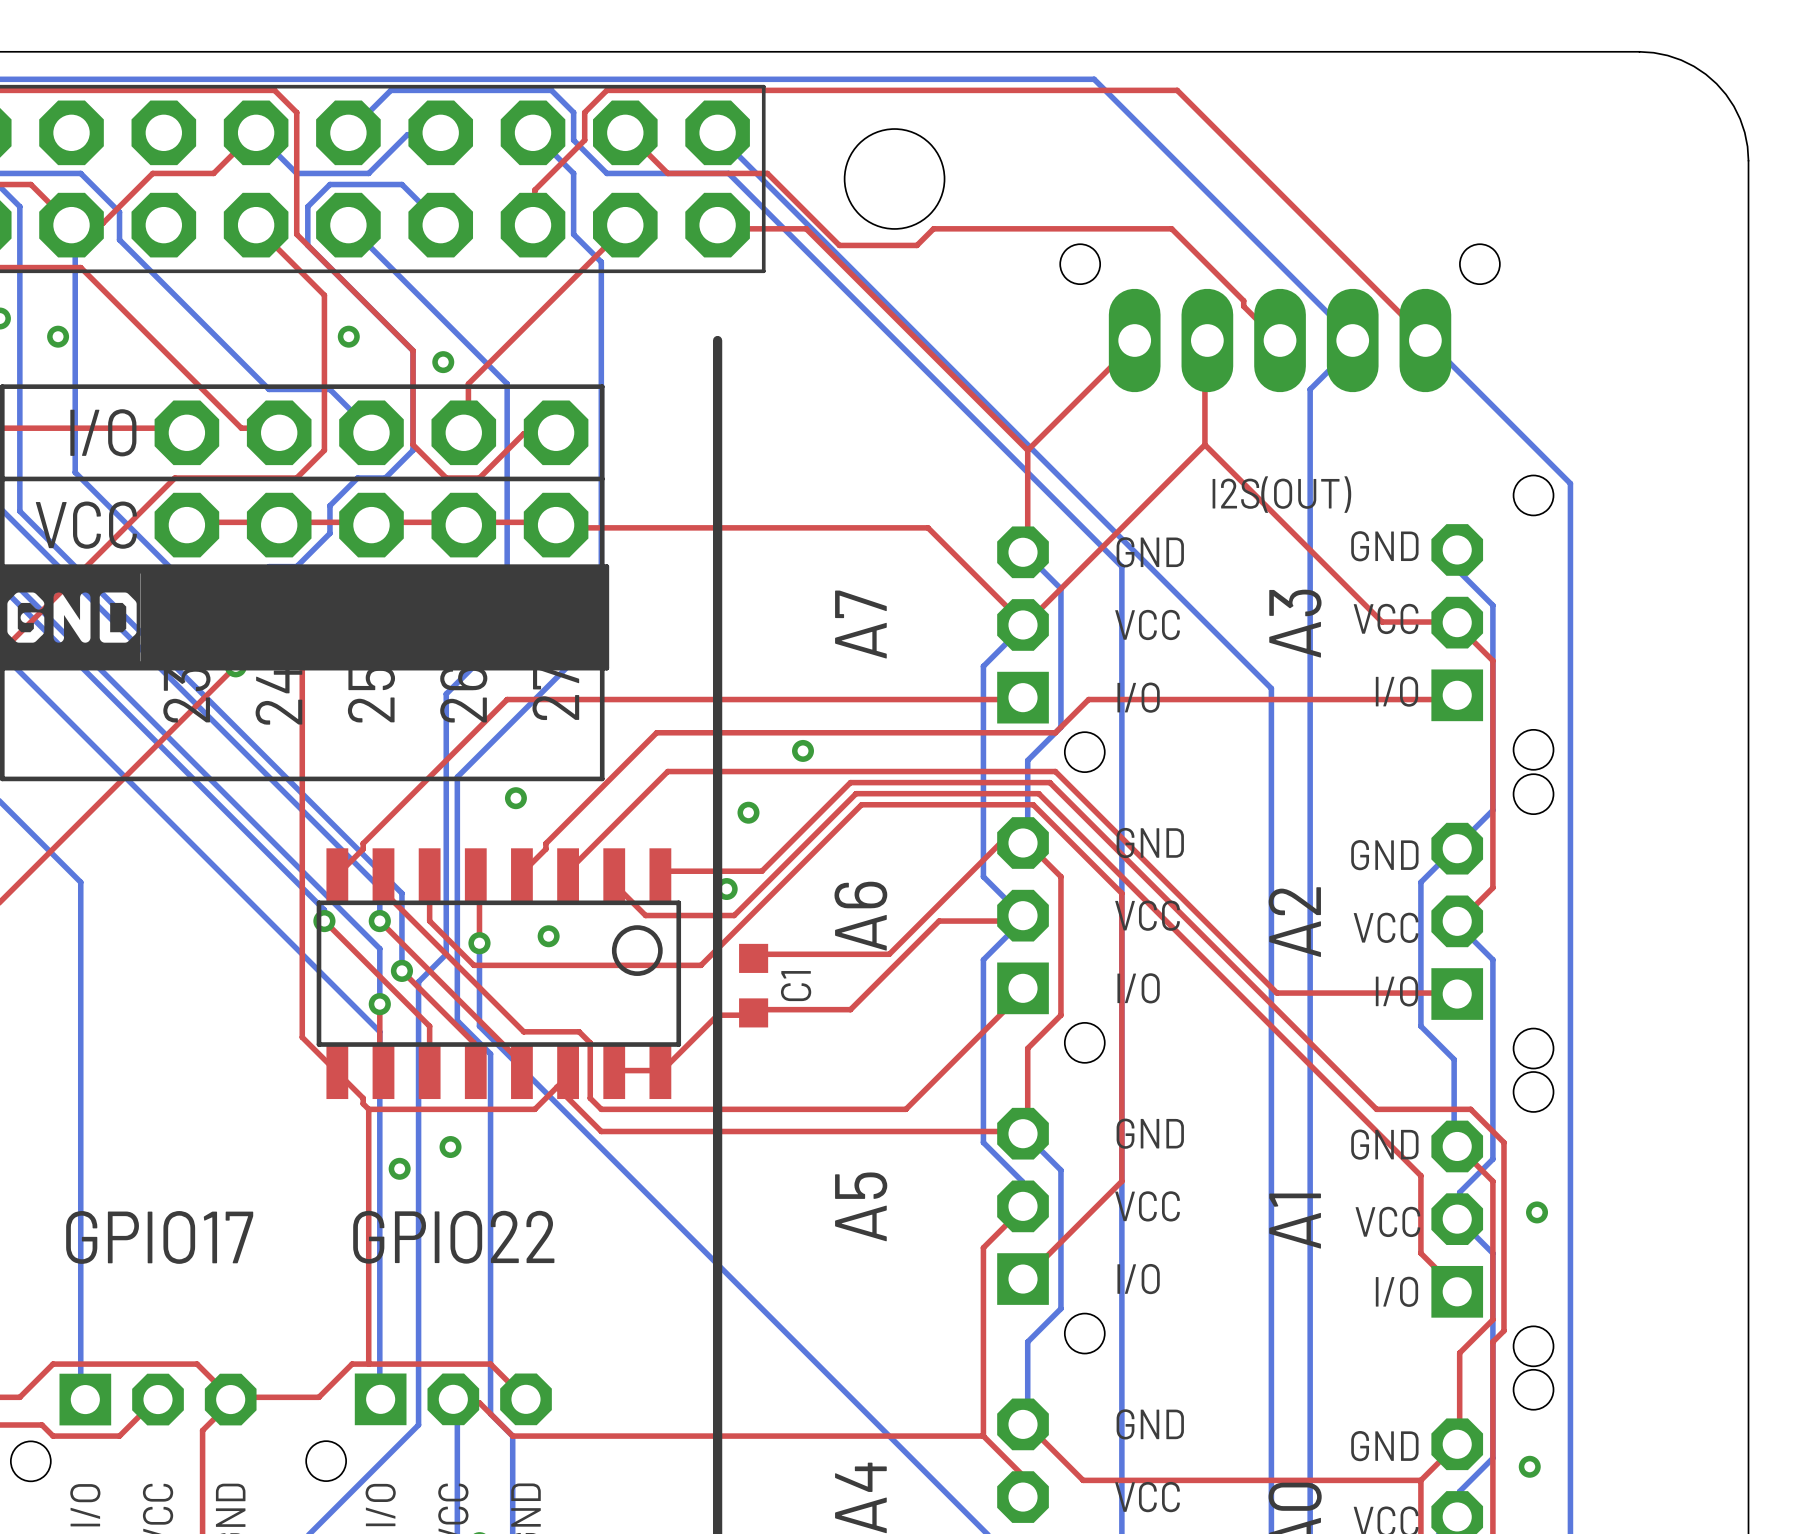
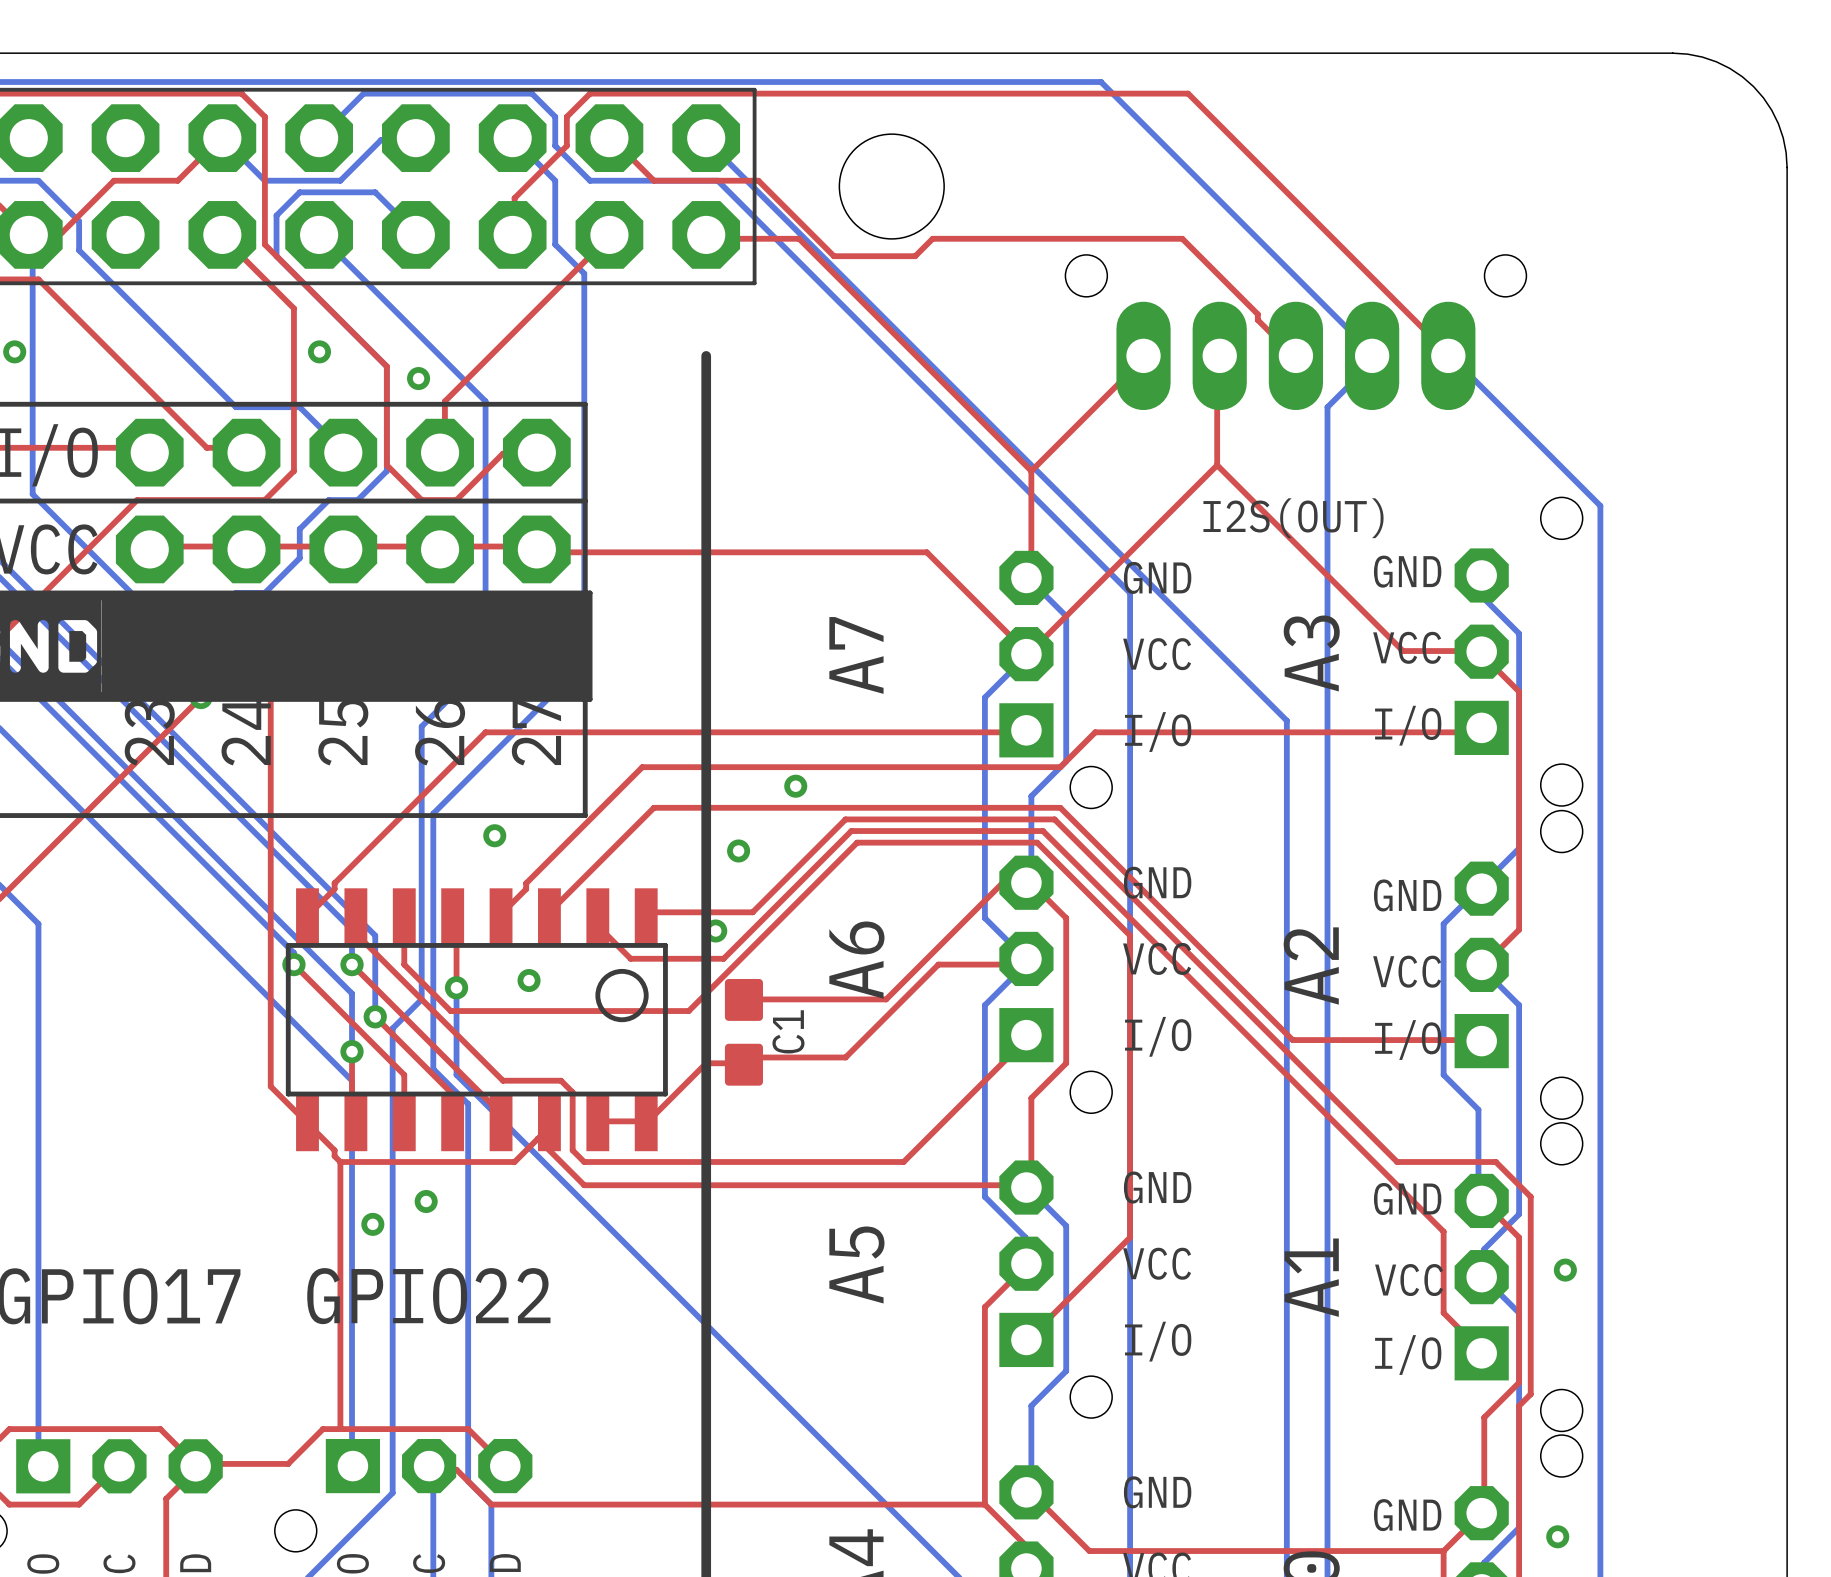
C1 footprint: [739, 943, 769, 1028] -> [724, 978, 764, 1086]

